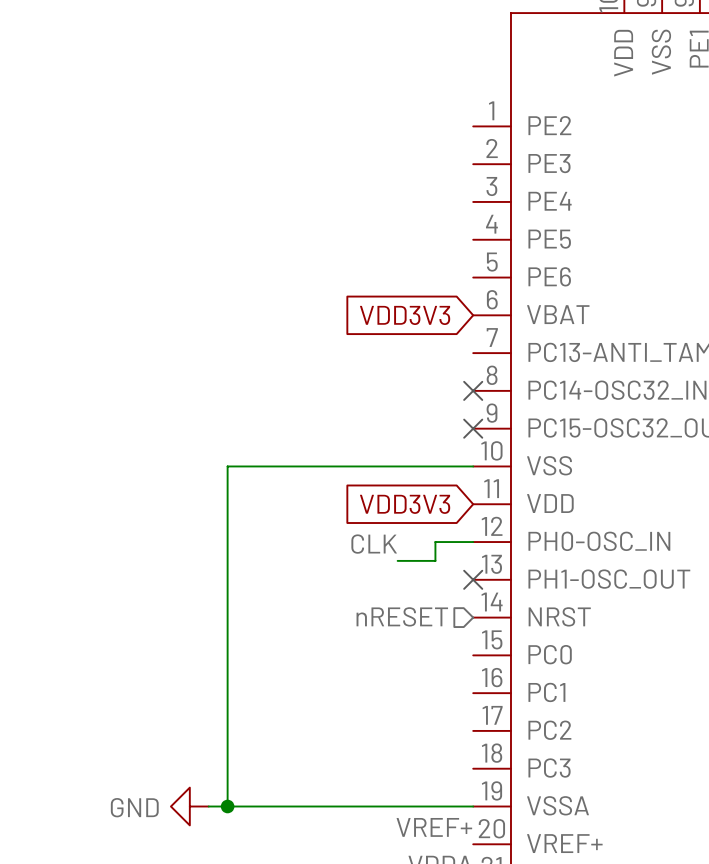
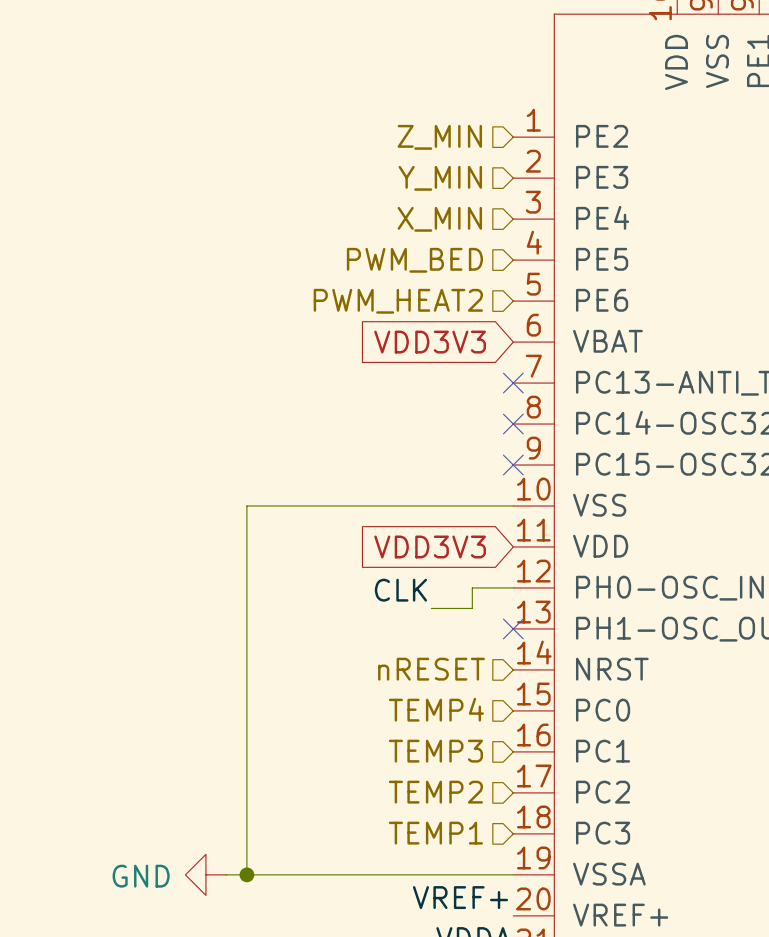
hierarchical label: none -> Z_MIN (439, 137)
hierarchical label: none -> Y_MIN (440, 178)
hierarchical label: none -> X_MIN (439, 219)
hierarchical label: none -> PWM_BED (414, 260)
hierarchical label: none -> PWM_HEAT2 (398, 301)
no-connect mark: none -> (513, 383)
hierarchical label: none -> TEMP4 (436, 709)
hierarchical label: none -> TEMP3 (435, 751)
hierarchical label: none -> TEMP2 (435, 792)
hierarchical label: none -> TEMP1 (435, 833)

